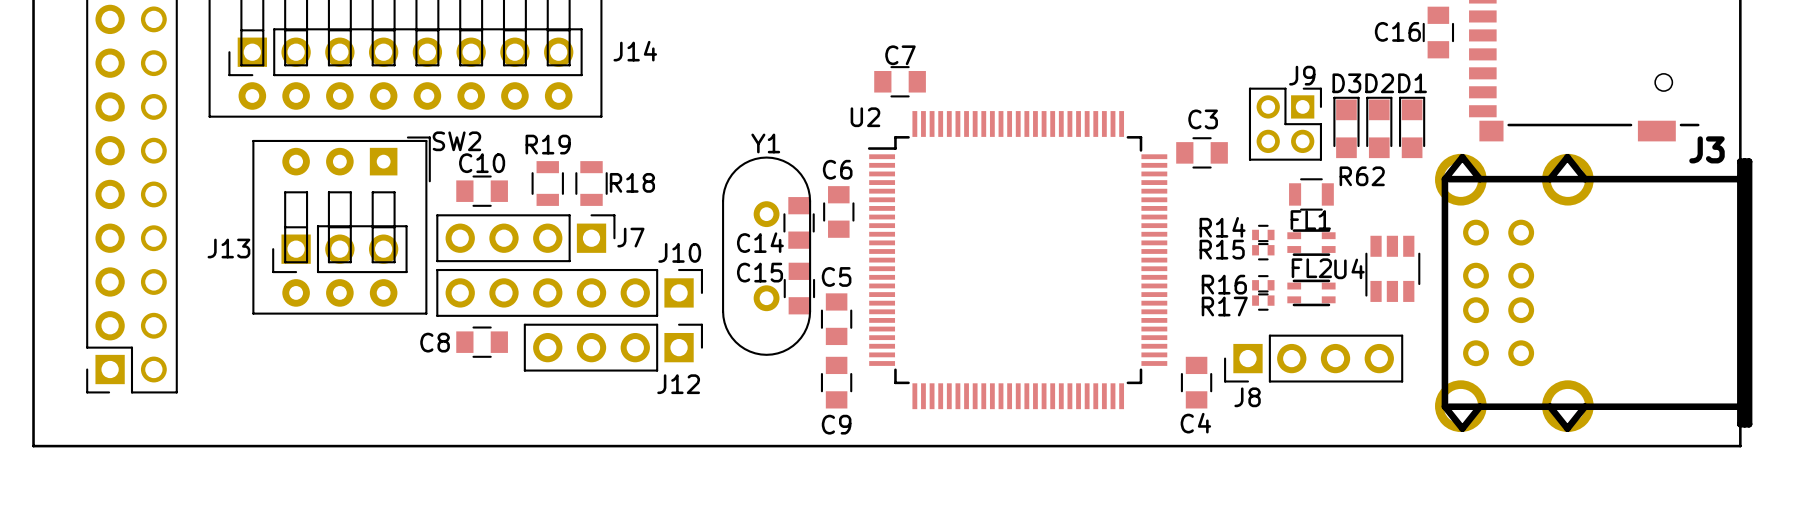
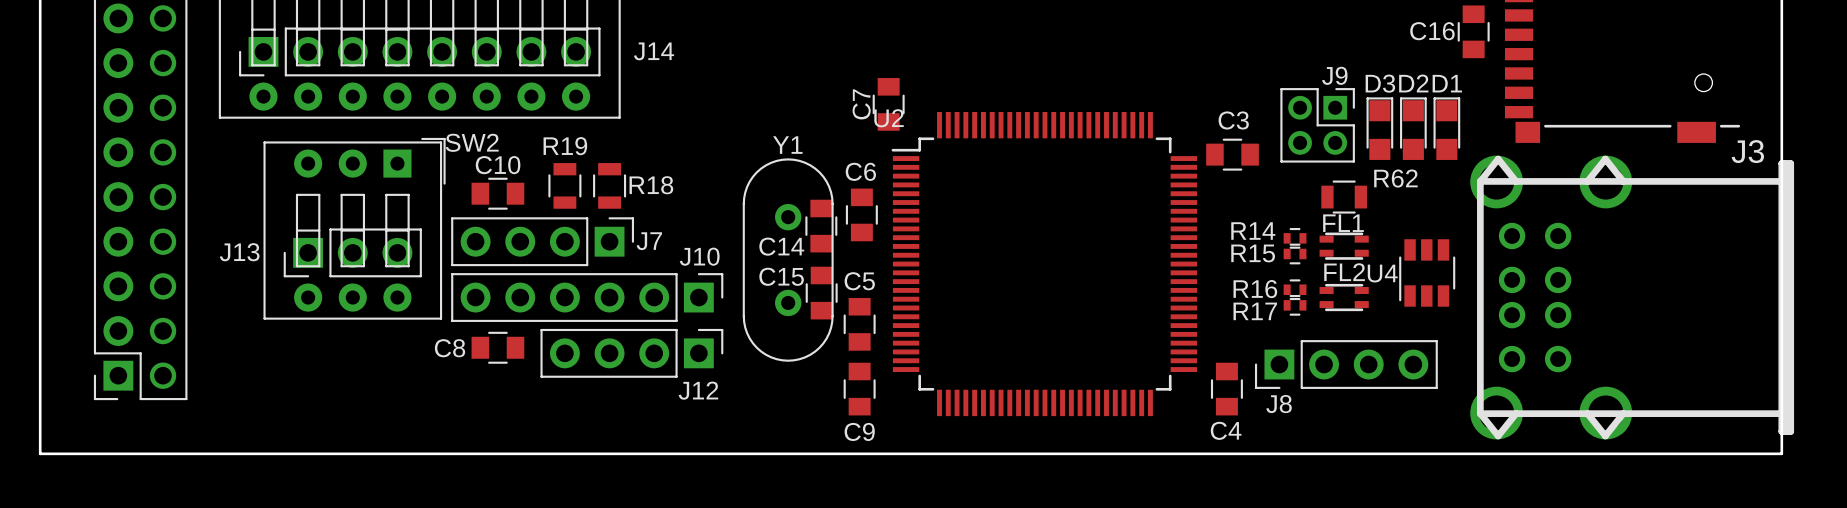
C7 name position: C7 (900, 55) -> C7 (861, 104)
C7 rotation: 0° (900, 81) -> 90° clockwise (888, 104)
C7 position: (900, 81) -> (888, 104)

